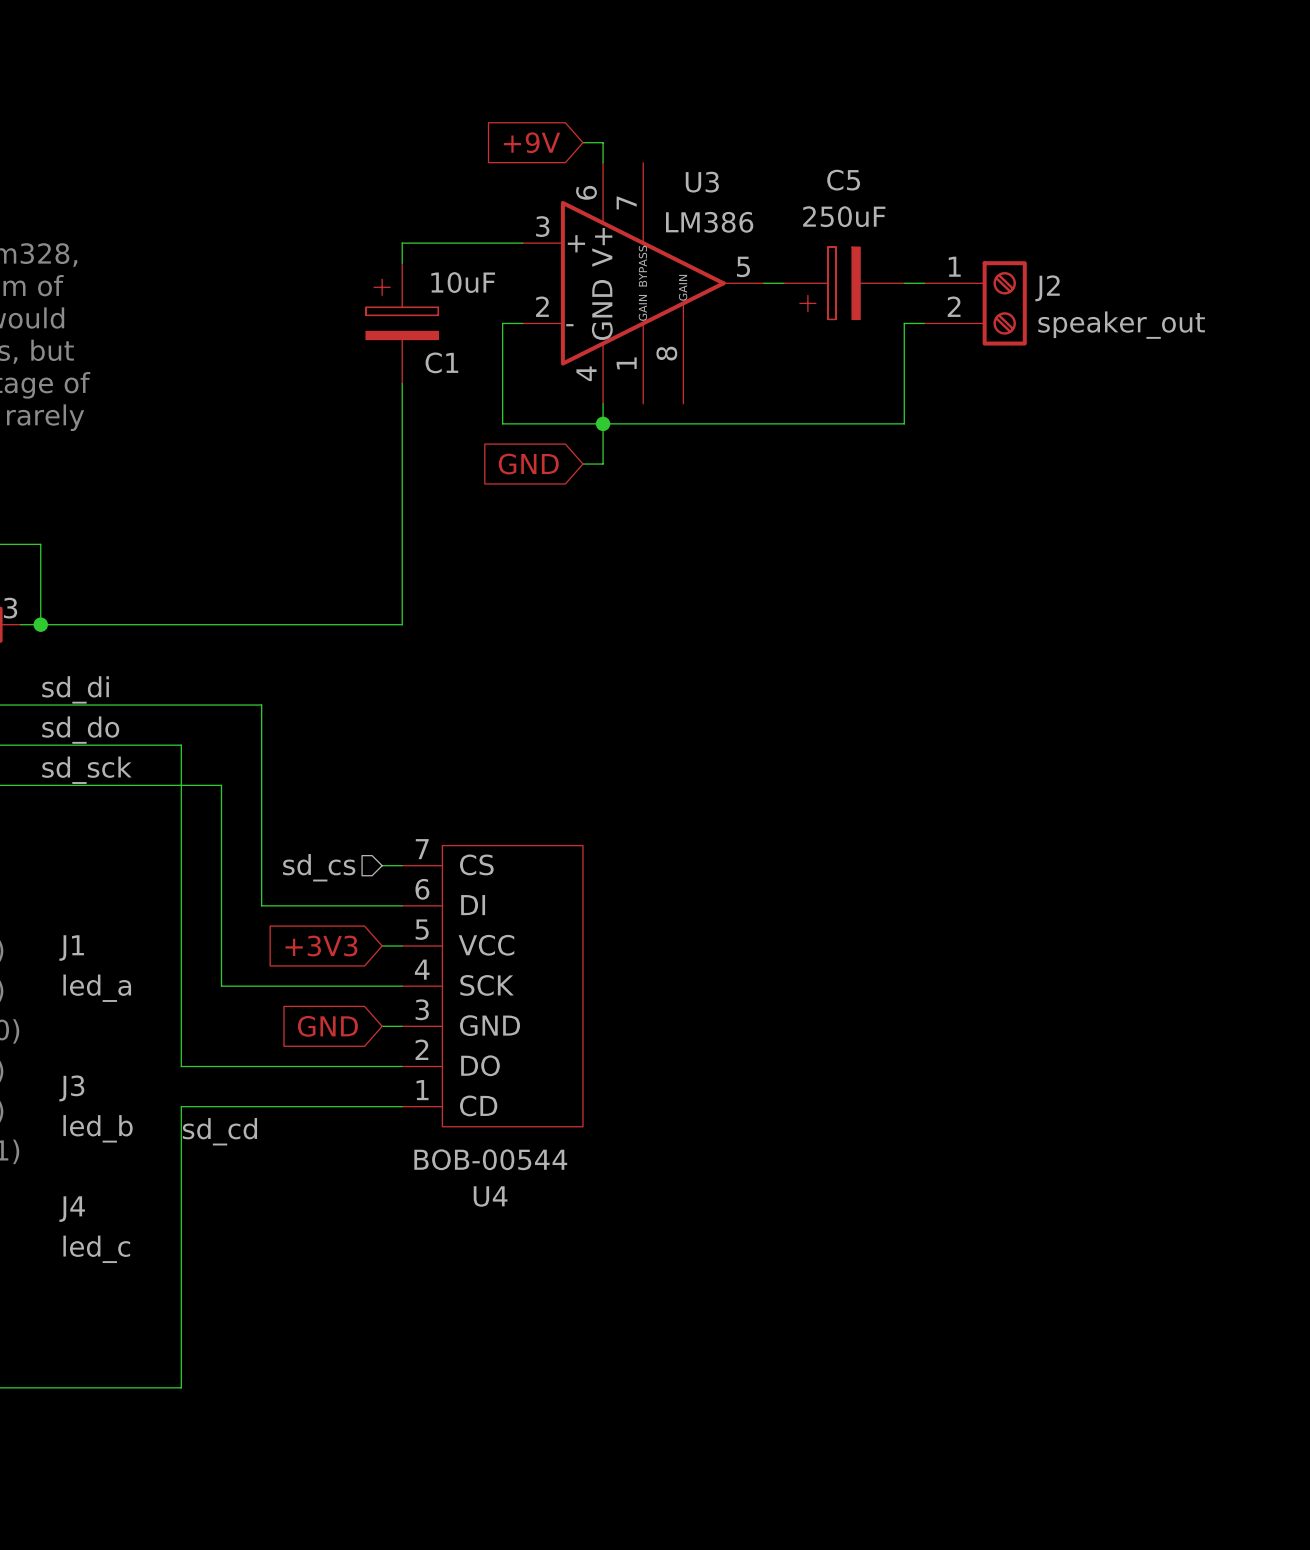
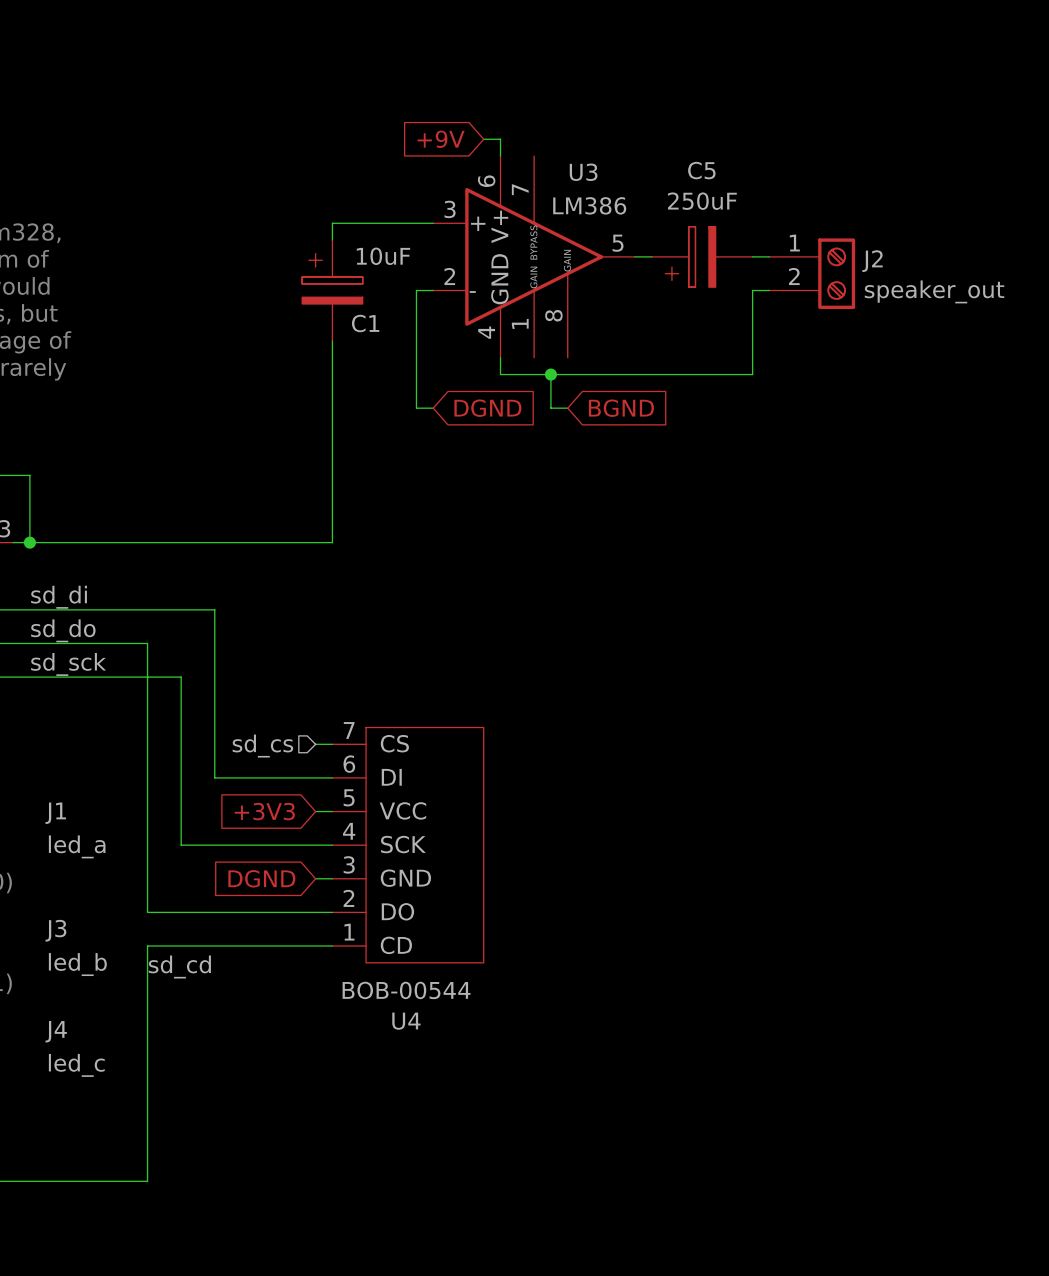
wire: (502, 423) (603, 423) (603, 464) (582, 464) -> (416, 374) (416, 408) (433, 408)
junction position: (603, 423) -> (550, 374)
wire: none -> (550, 374) (550, 408) (567, 408)
global label: GND (528, 464) -> DGND (487, 408)
global label: none -> BGND (621, 408)
global label: GND (327, 1026) -> DGND (261, 878)

